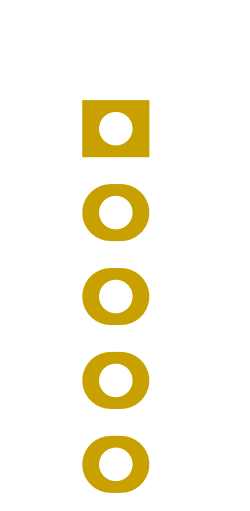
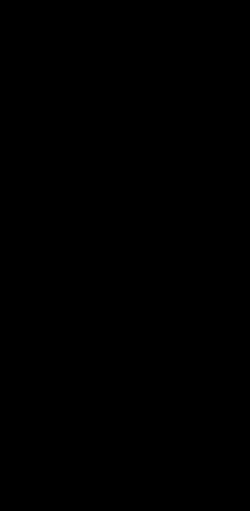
part: (115, 296) -> none

